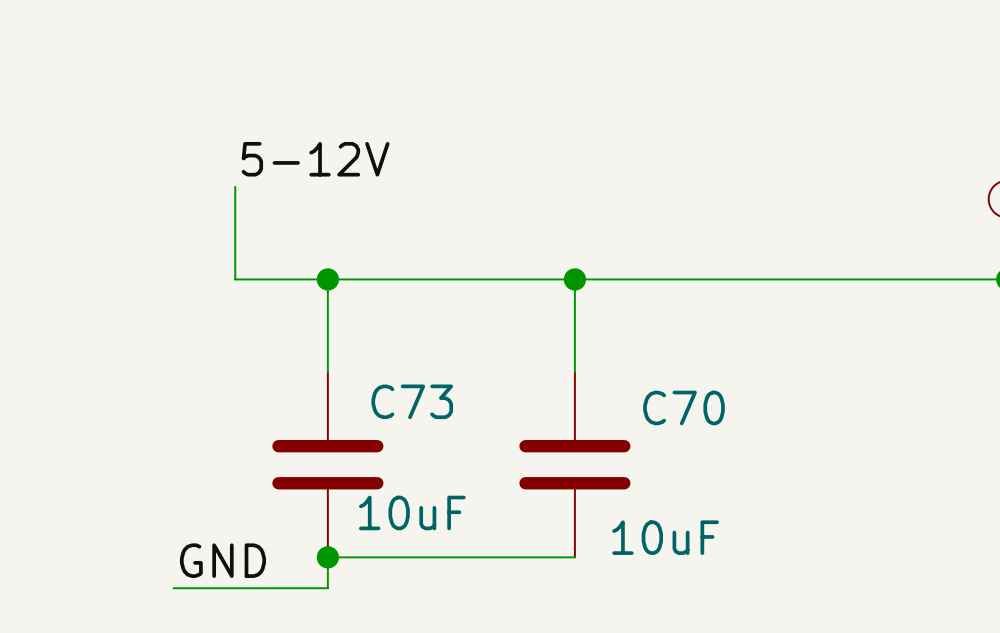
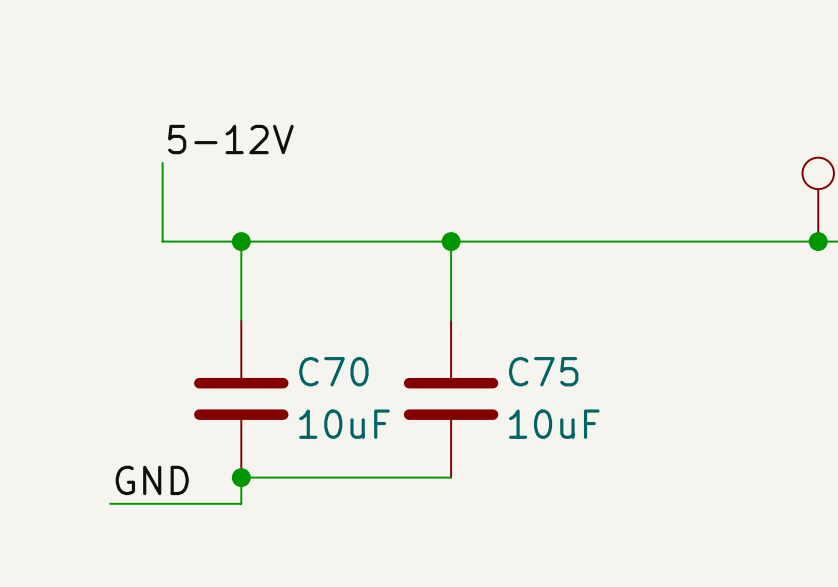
C73 name: C73 (412, 401) -> C70 (333, 371)
C70 name: C70 (683, 407) -> C75 (543, 371)
C73 value position: 10uF (412, 512) -> 10uF (344, 424)
C70 value position: 10uF (665, 537) -> 10uF (554, 424)

